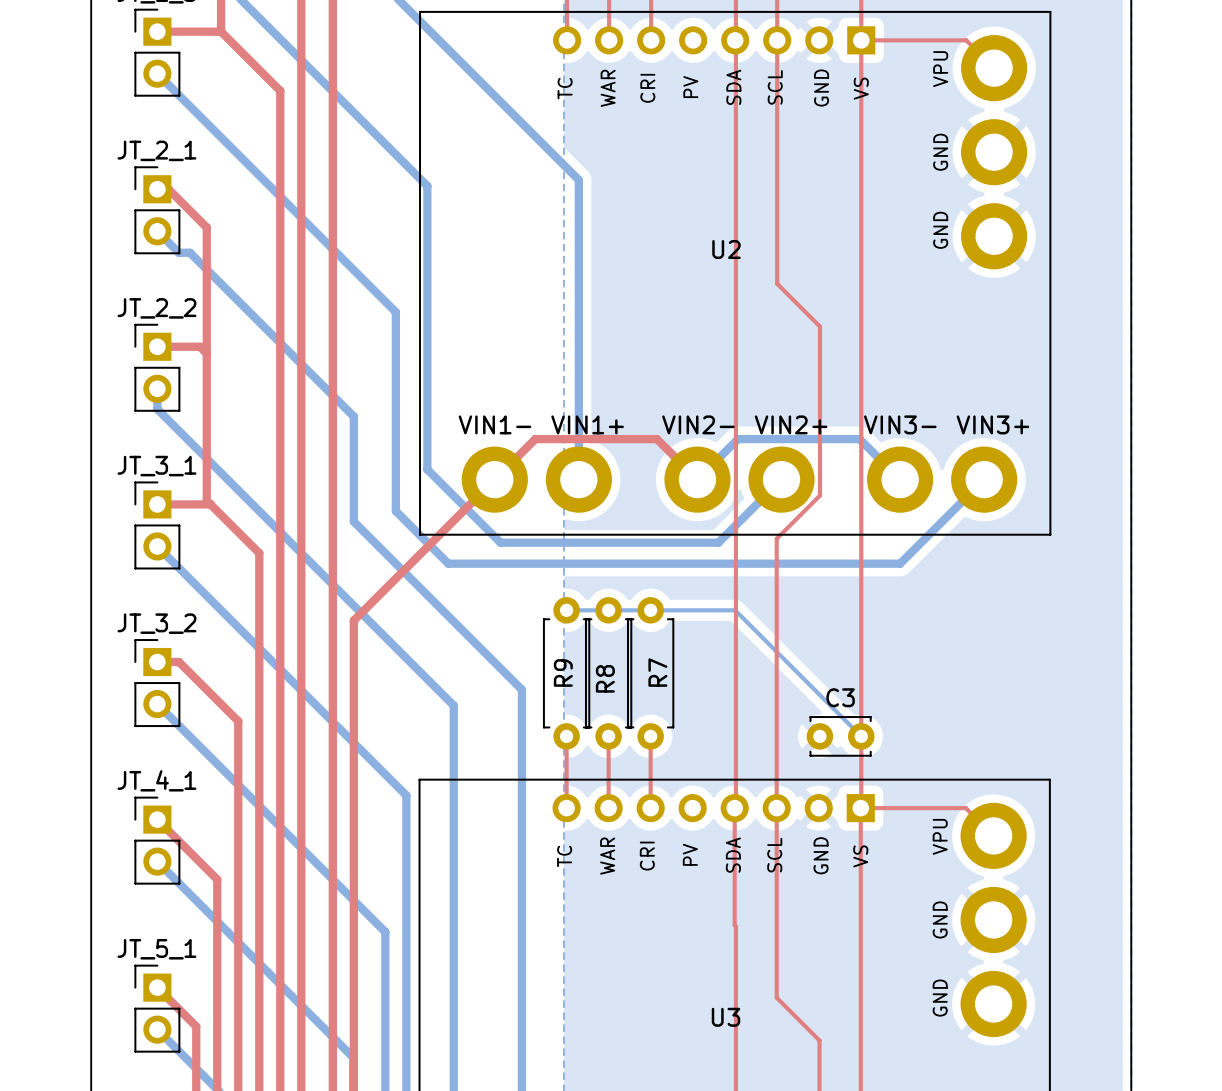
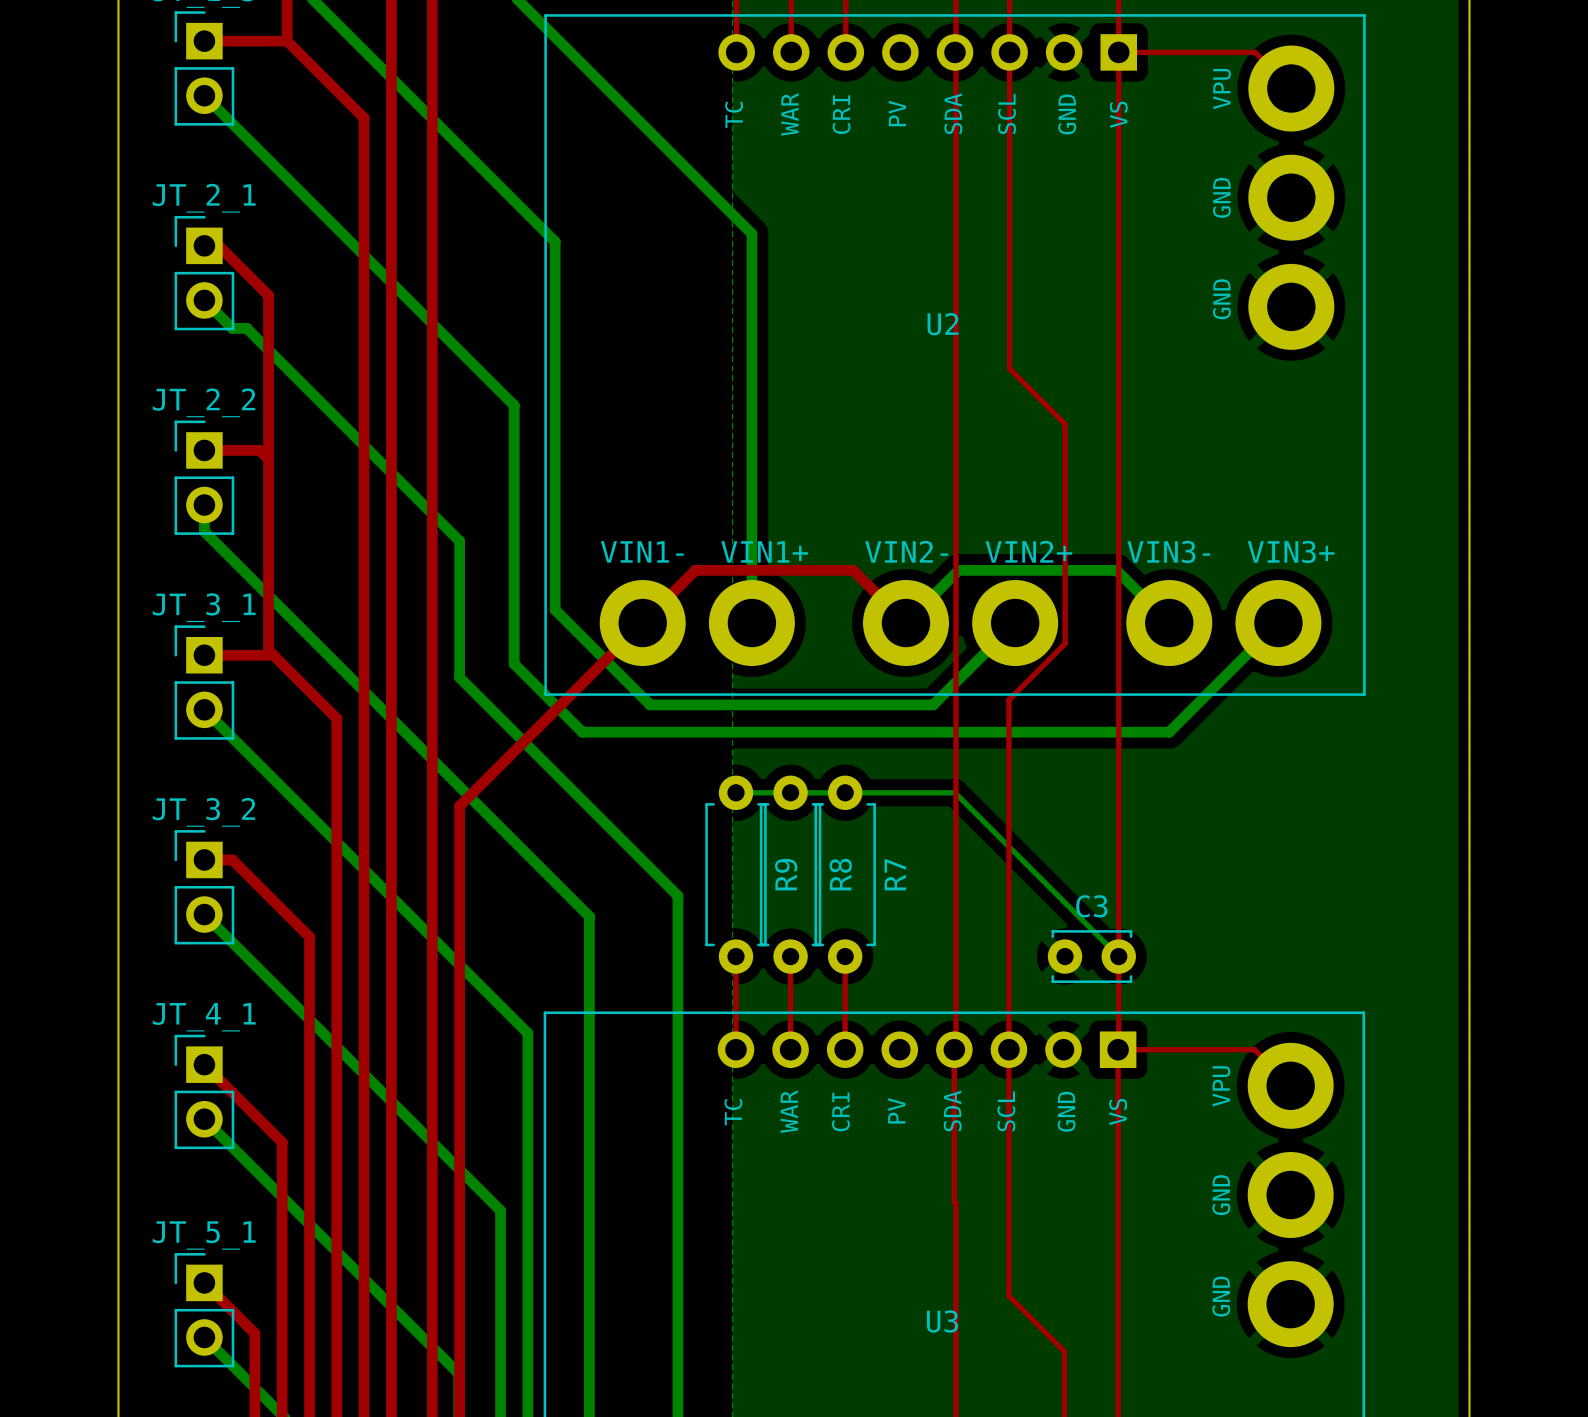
R9 name position: R9 (563, 672) -> R9 (786, 874)
R7 name position: R7 (657, 672) -> R7 (895, 874)
R8 name position: R8 (605, 678) -> R8 (840, 874)

